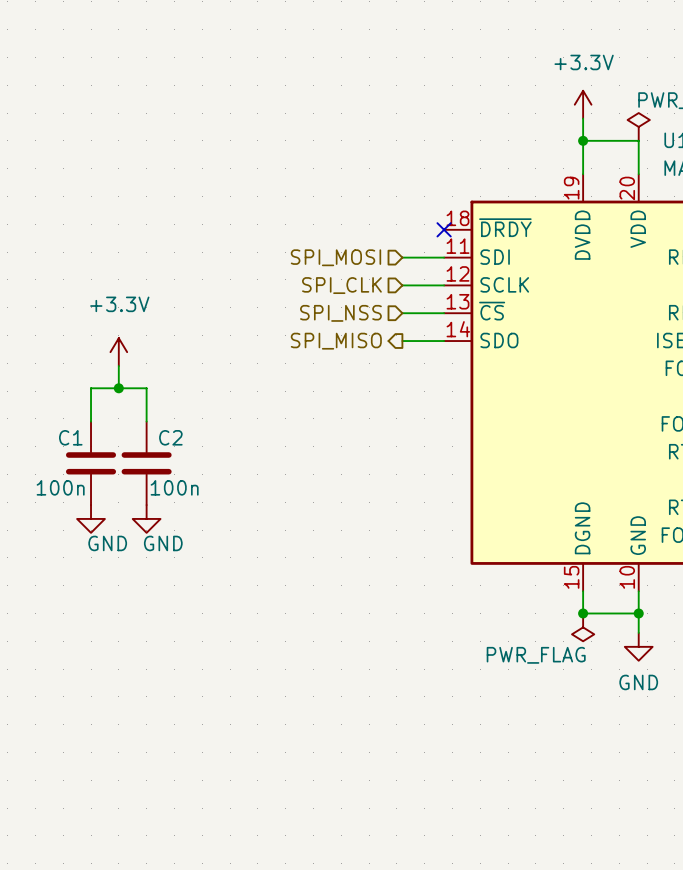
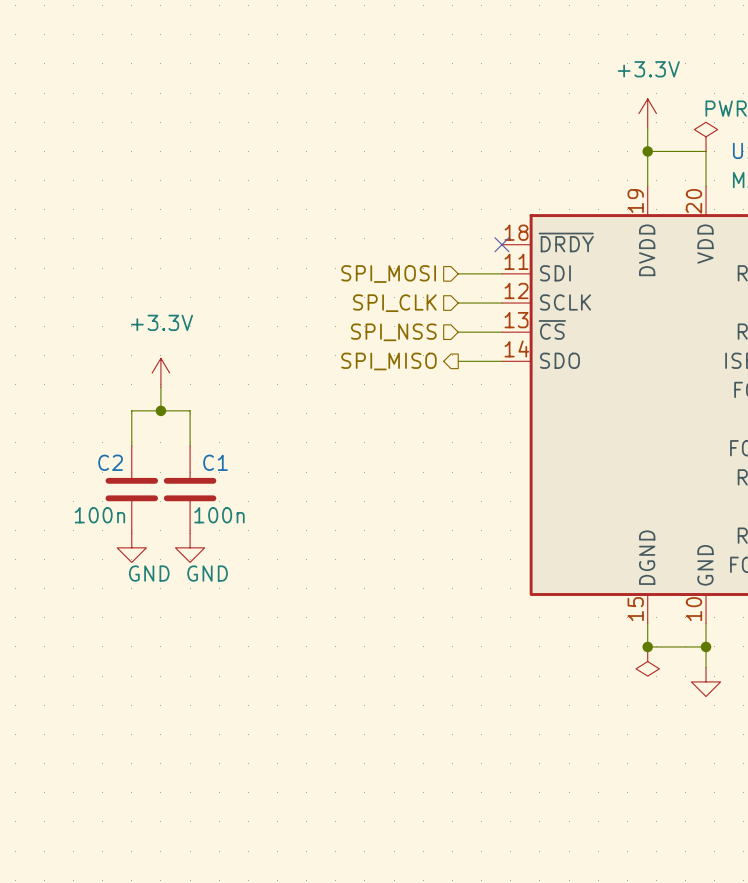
C1 name: C1 (70, 437) -> C2 (110, 462)
C2 name: C2 (170, 437) -> C1 (215, 462)
power symbol text: PWR_FLAG (536, 655) -> none
power symbol text: GND (638, 682) -> none

